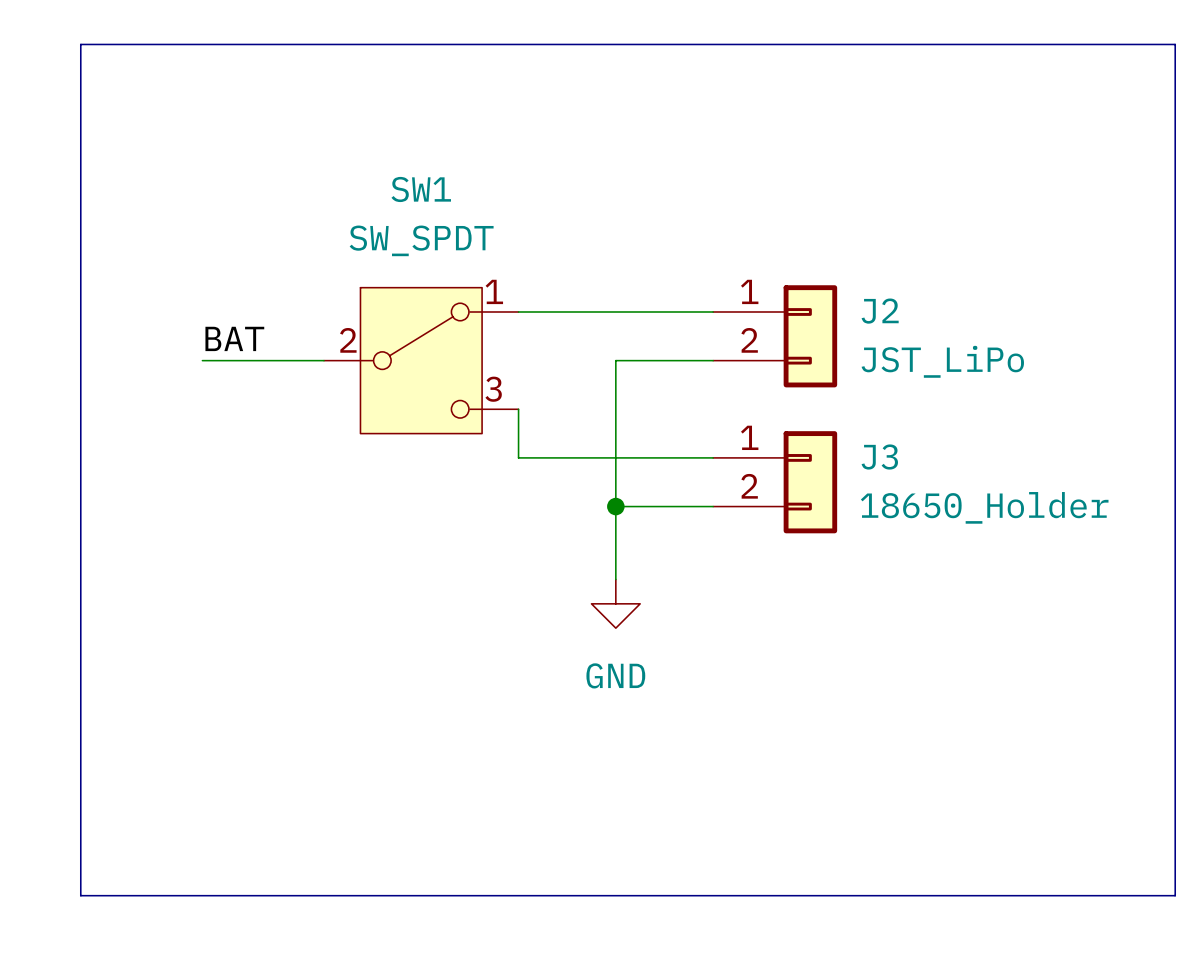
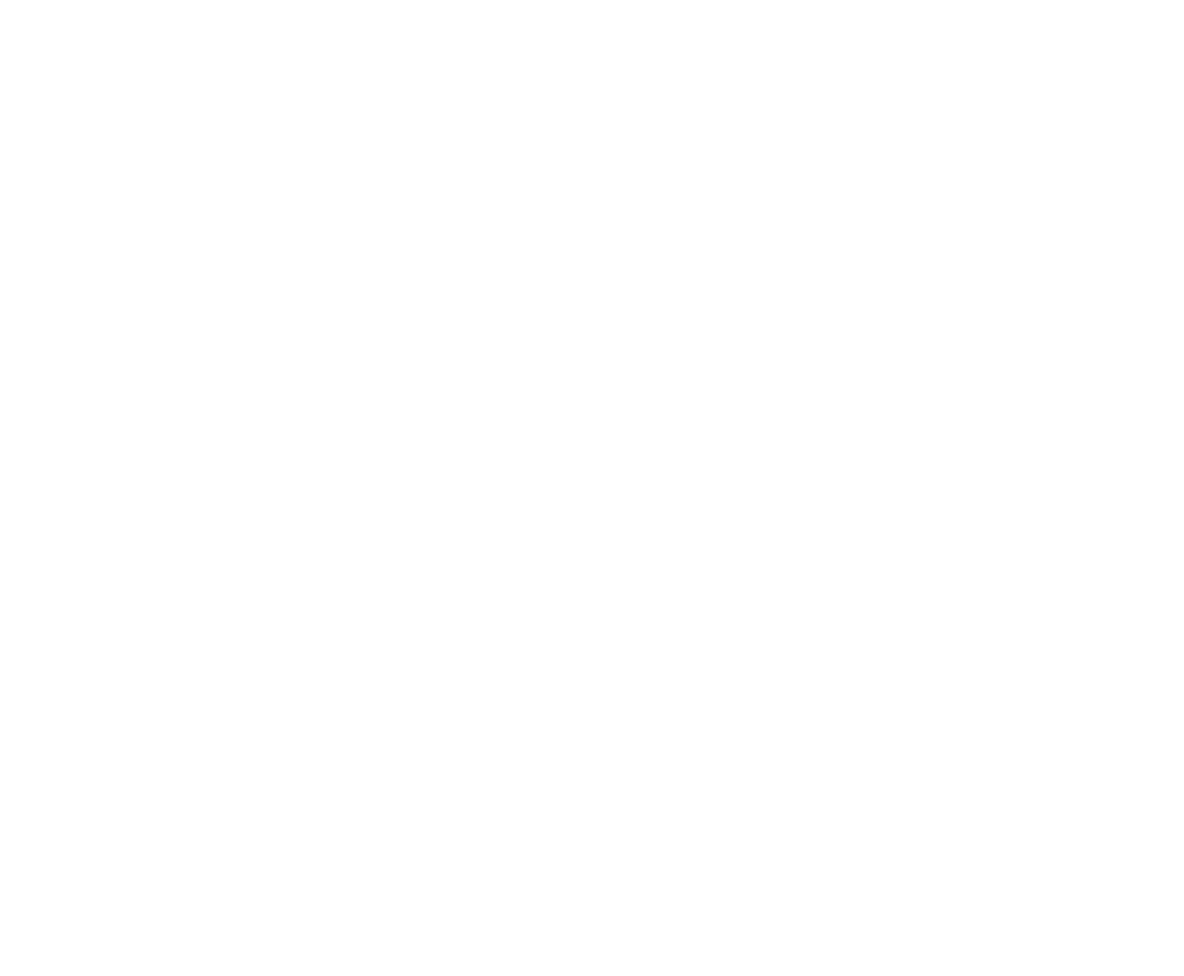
line: (80, 44) (1175, 44) (1175, 895) (80, 895) (80, 44) -> none
wire: (518, 311) (713, 311) -> none
J2: JST_LiPo (775, 336) -> none
label: BAT (234, 338) -> none
wire: (202, 360) (323, 360) -> none
SW1: SW_SPDT (421, 360) -> none
wire: (713, 360) (615, 360) (615, 579) -> none
wire: (518, 409) (518, 457) (713, 457) -> none
J3: 18650_Holder (775, 482) -> none
wire: (615, 506) (713, 506) -> none
junction: (615, 506) -> none
power symbol: GND (615, 603) -> none

